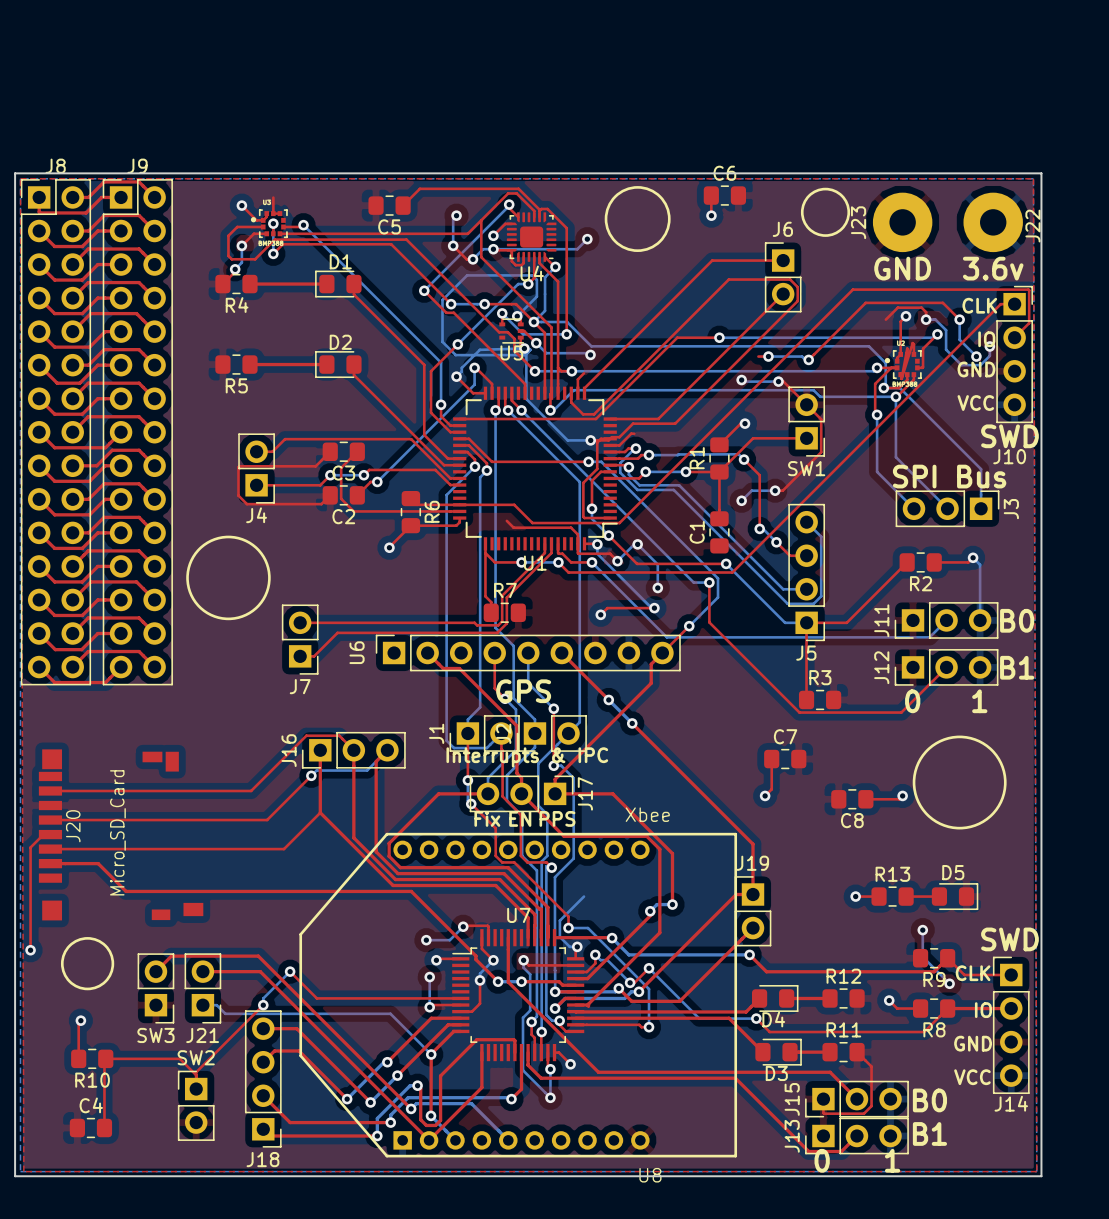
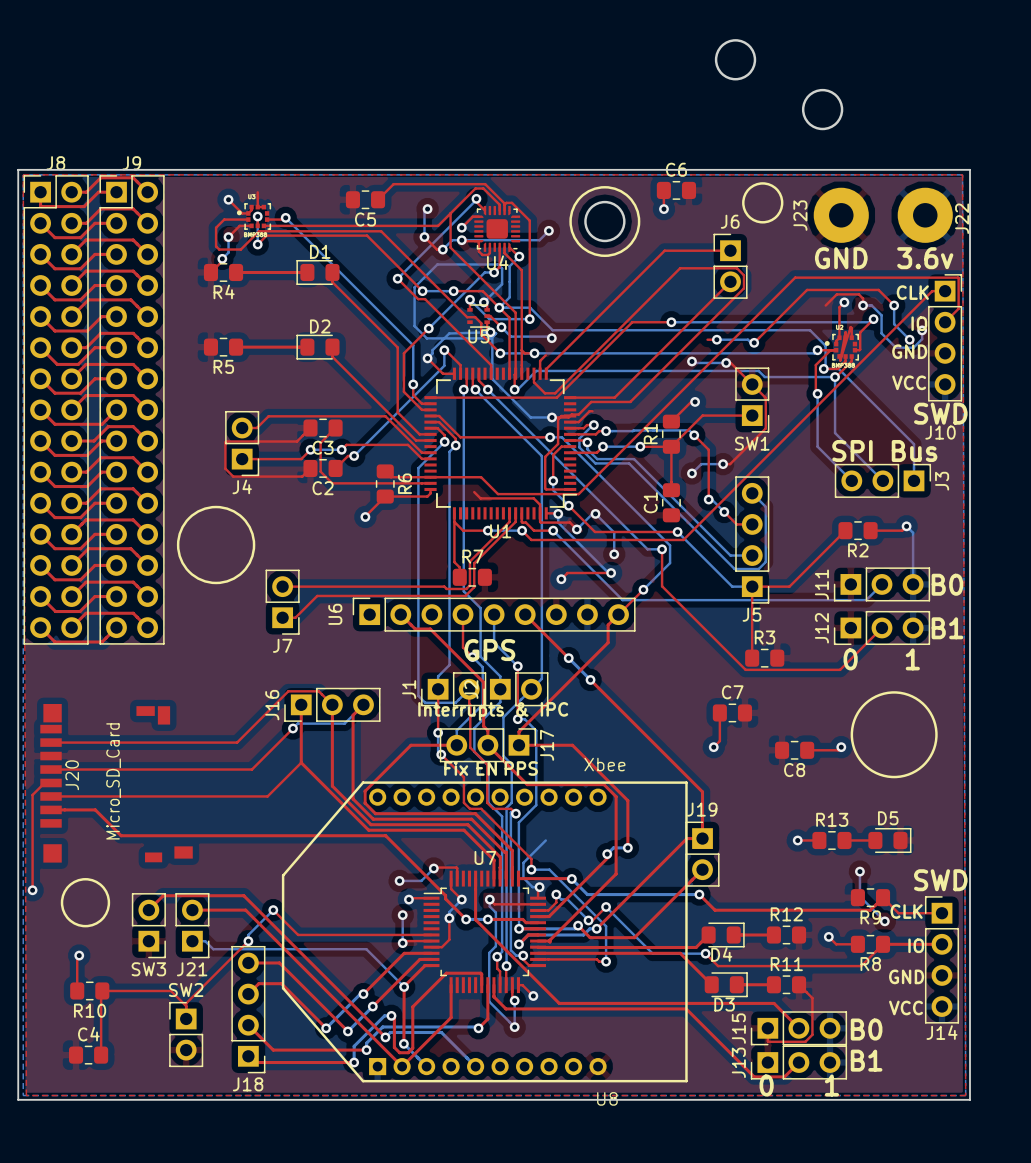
round board edge: none -> [714, 39, 757, 81]
round board edge: none -> [801, 88, 844, 131]
drawing: [604, 186, 671, 252] -> none
drawing shape: [800, 187, 851, 237] -> [742, 182, 784, 224]
drawing: none -> [569, 186, 641, 258]
round board edge: none -> [584, 200, 626, 243]

